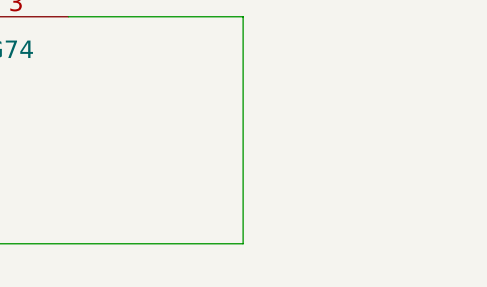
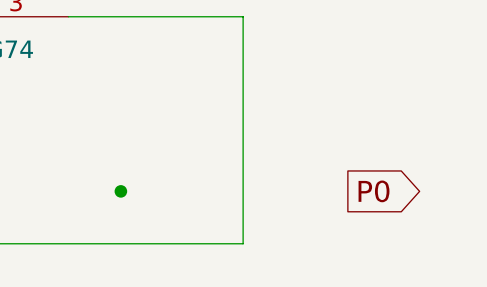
junction: none -> (120, 191)
global label: none -> P0 (374, 191)

